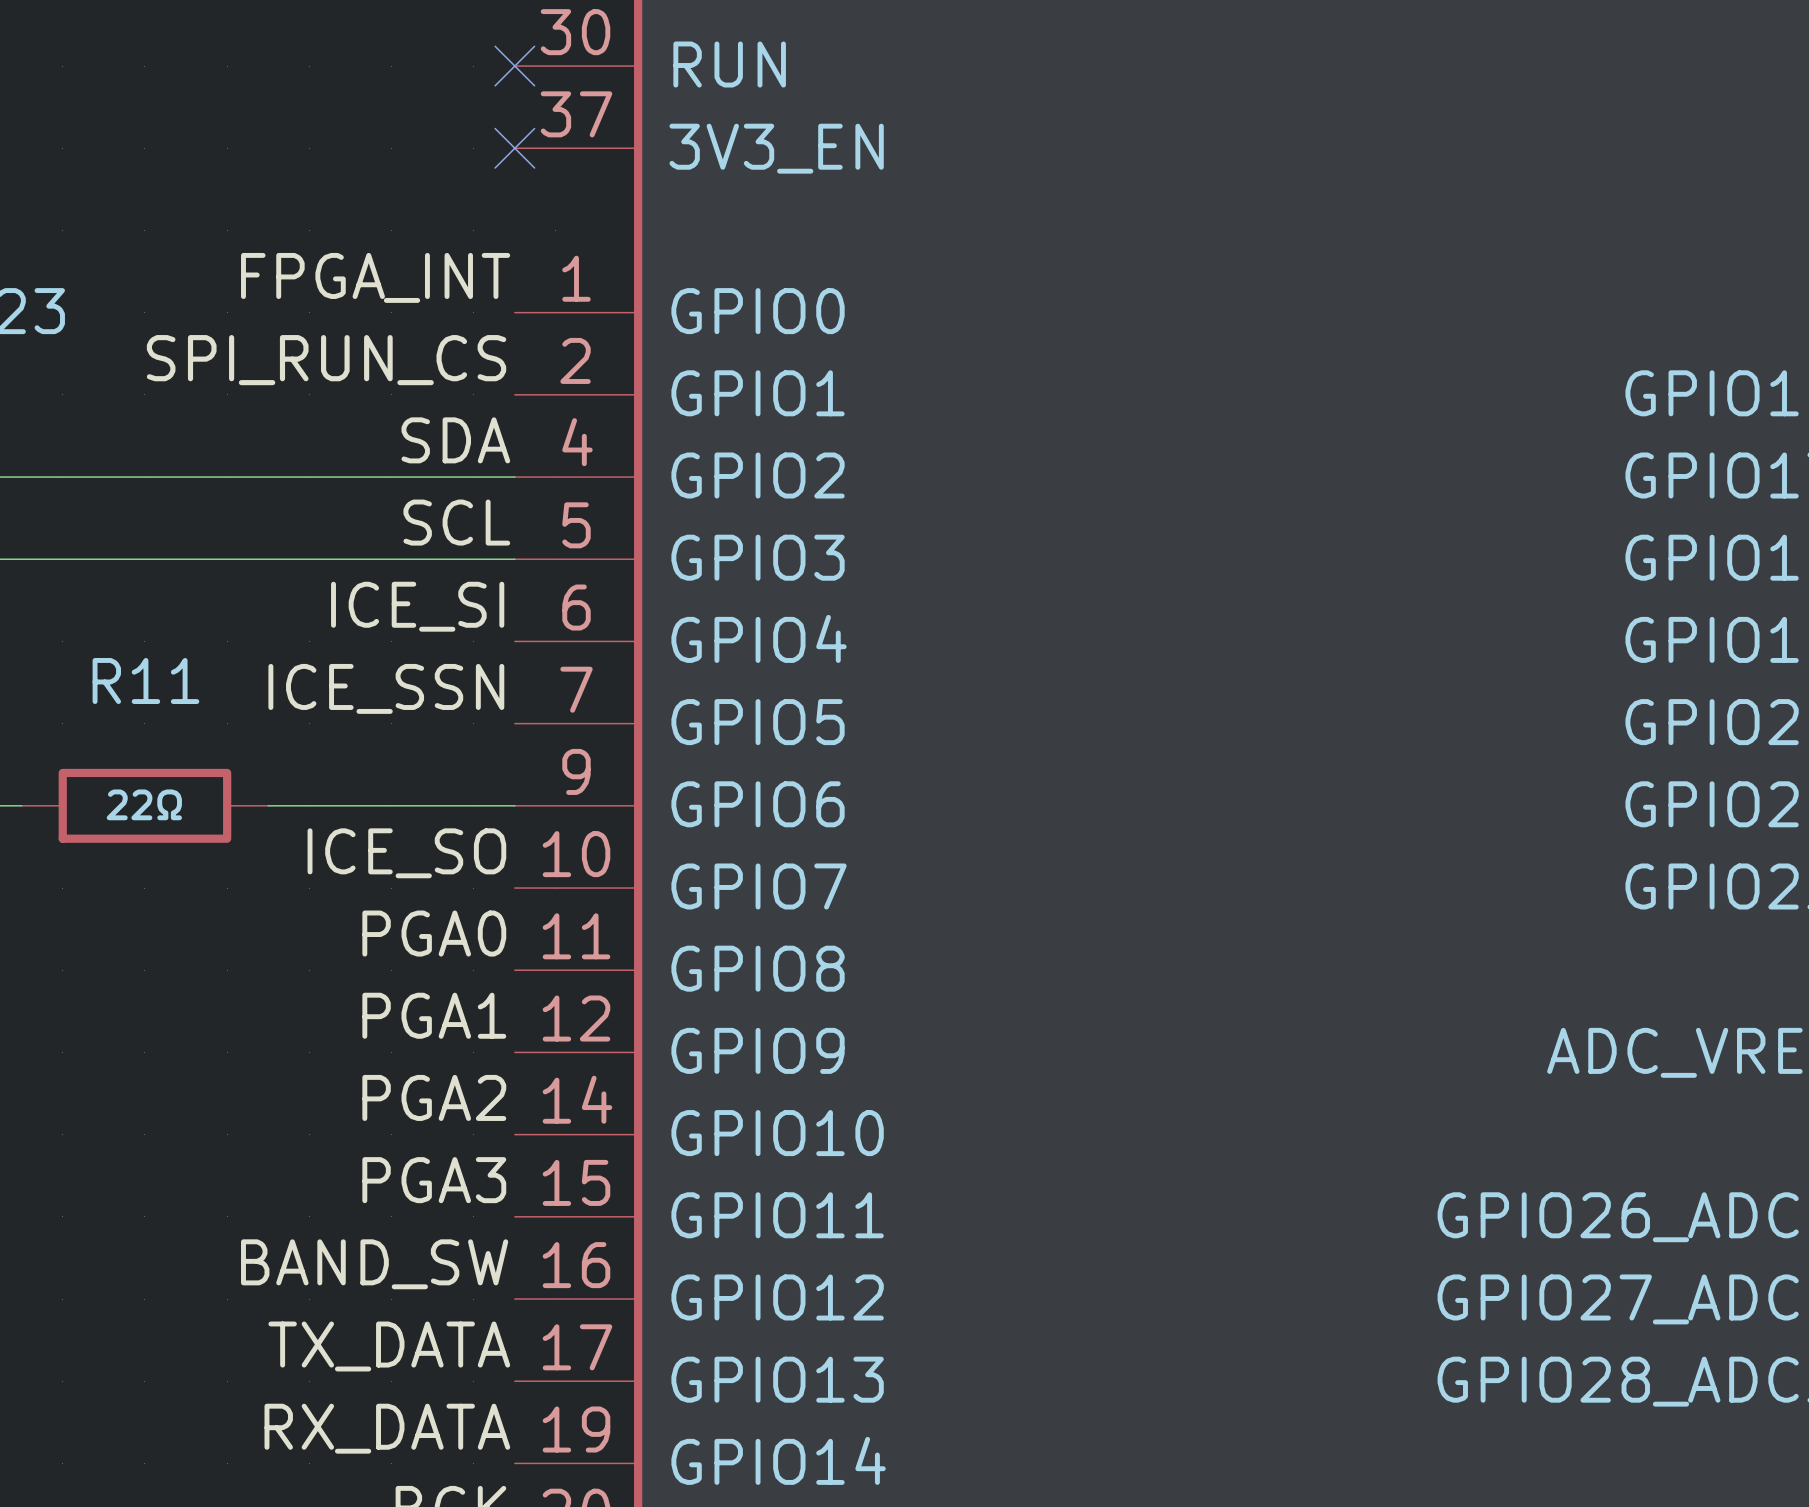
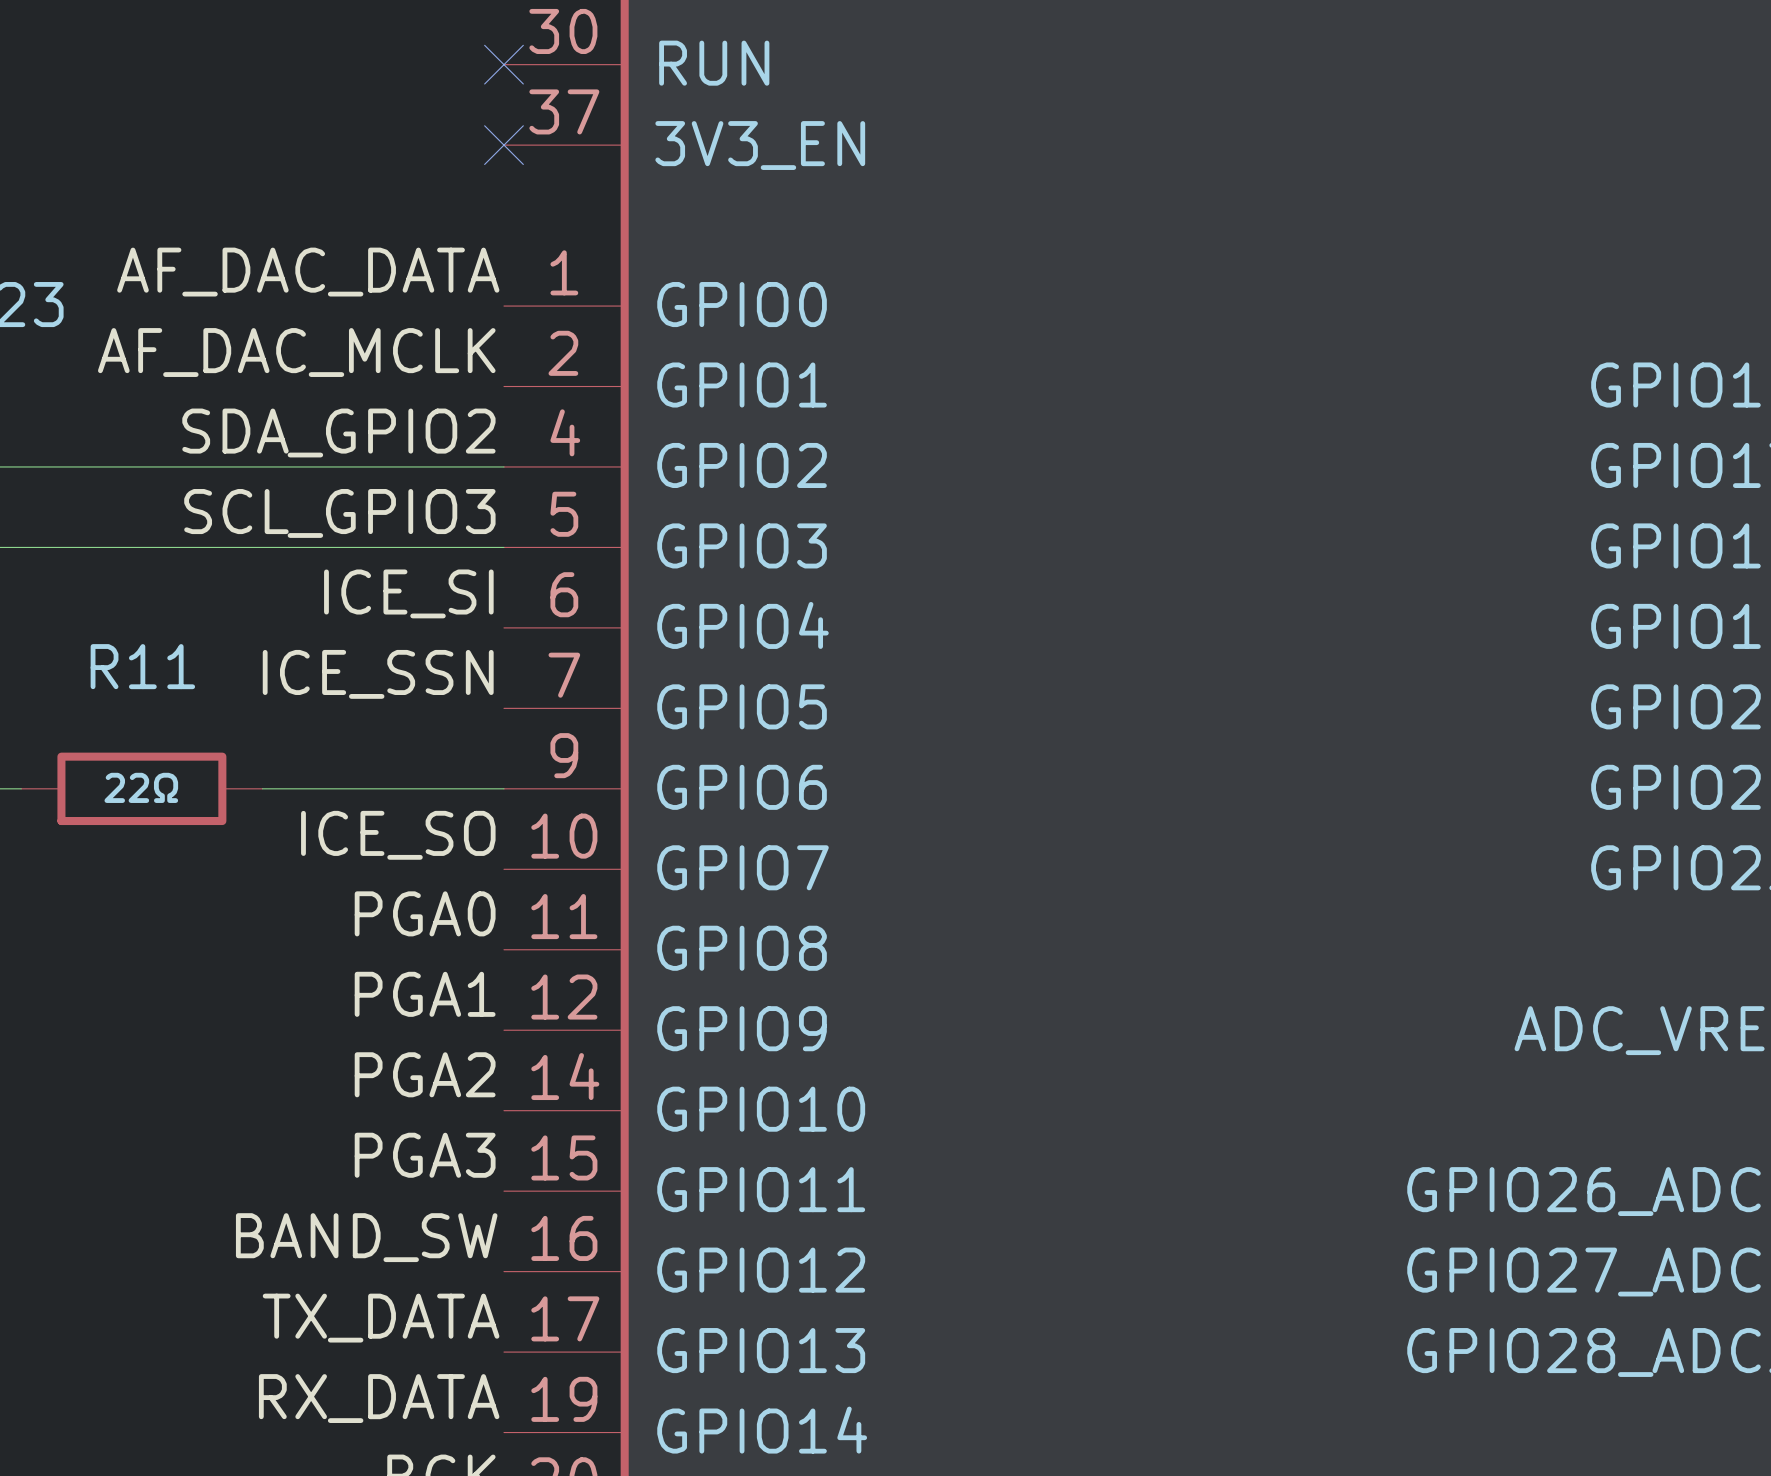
label: FPGA_INT (375, 277) -> AF_DAC_DATA (308, 272)
label: SPI_RUN_CS (326, 360) -> AF_DAC_MCLK (296, 352)
label: SDA (455, 440) -> SDA_GPIO2 (338, 432)
label: SCL (456, 522) -> SCL_GPIO3 (339, 513)

